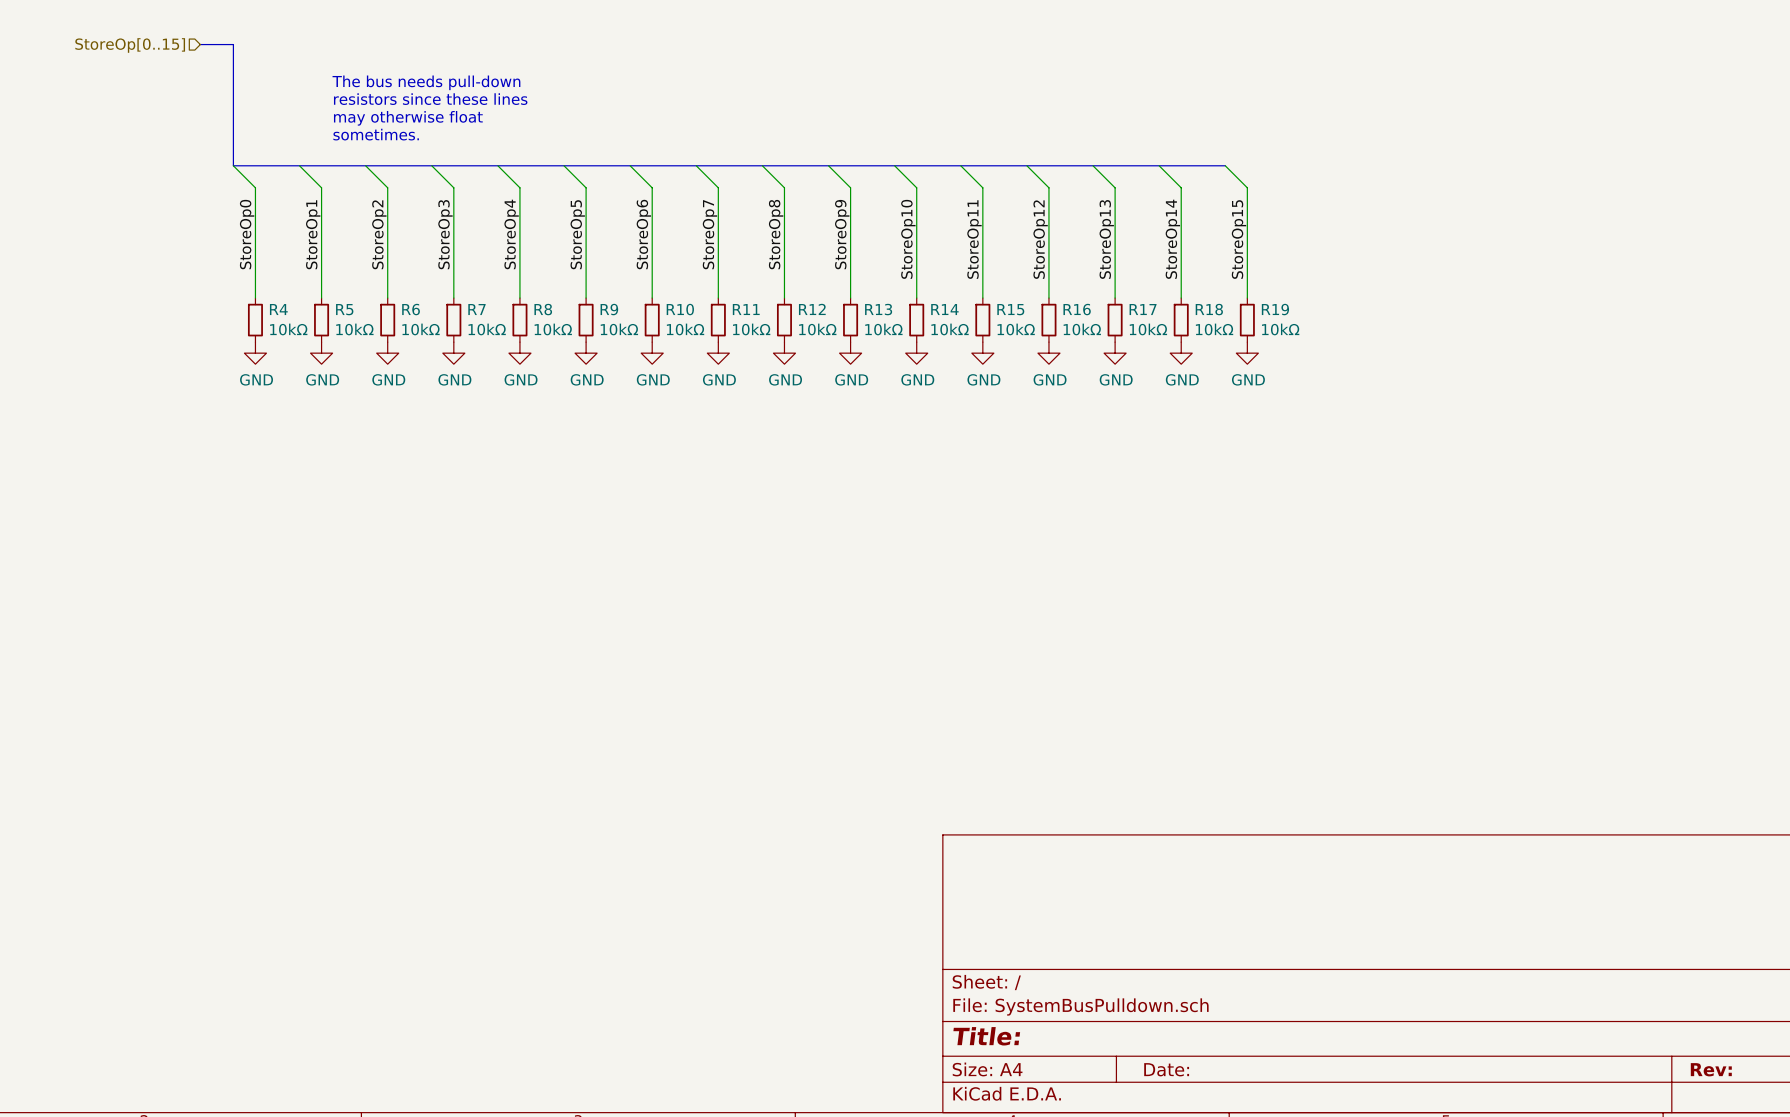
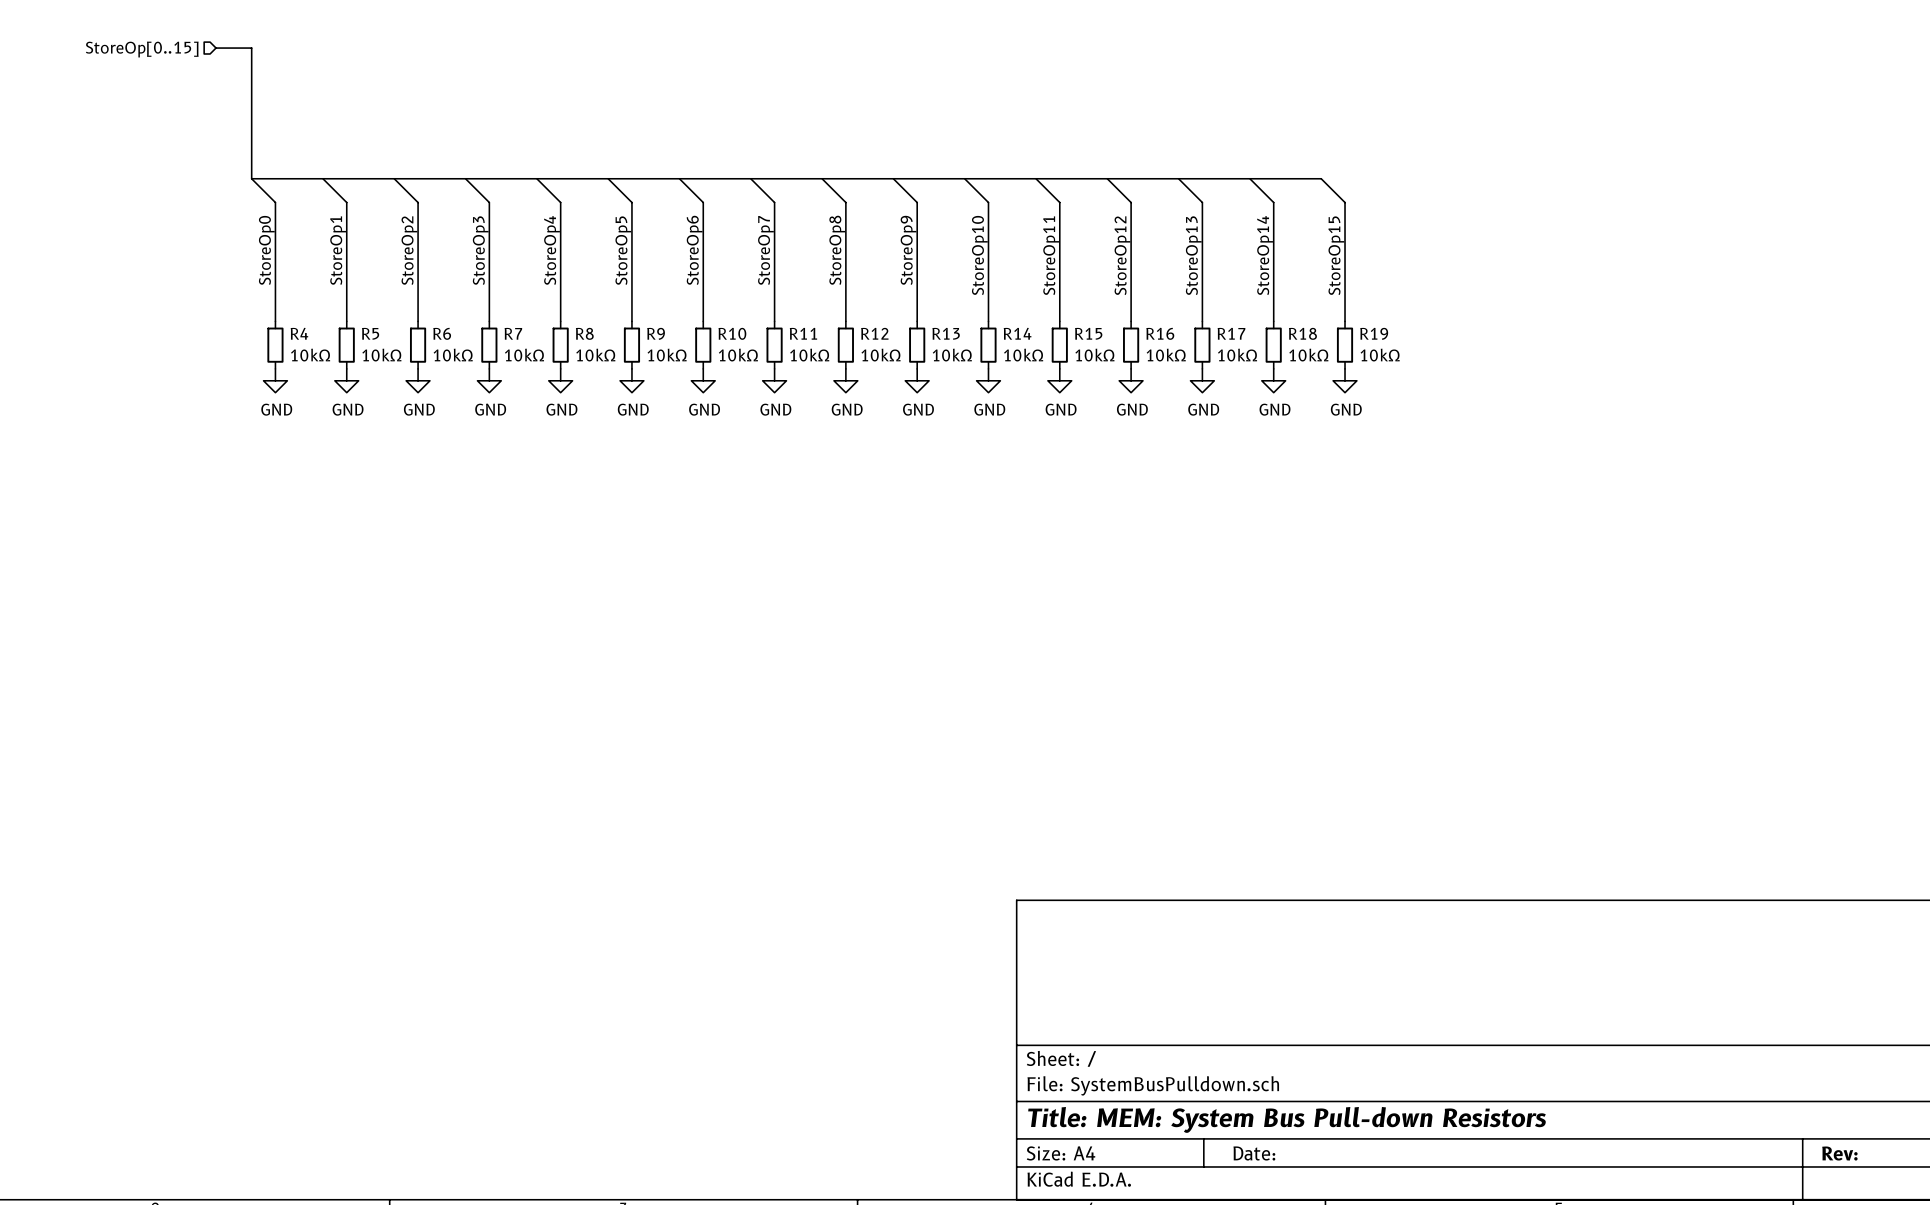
text: The bus needs pull-down (426, 82) -> none
text: resistors since these lines (430, 99) -> none
text: may otherwise float (408, 118) -> none
text: sometimes. (376, 134) -> none
title block: Title: (986, 1036) -> Title: MEM: System Bus Pull-down Resistors (1287, 1119)

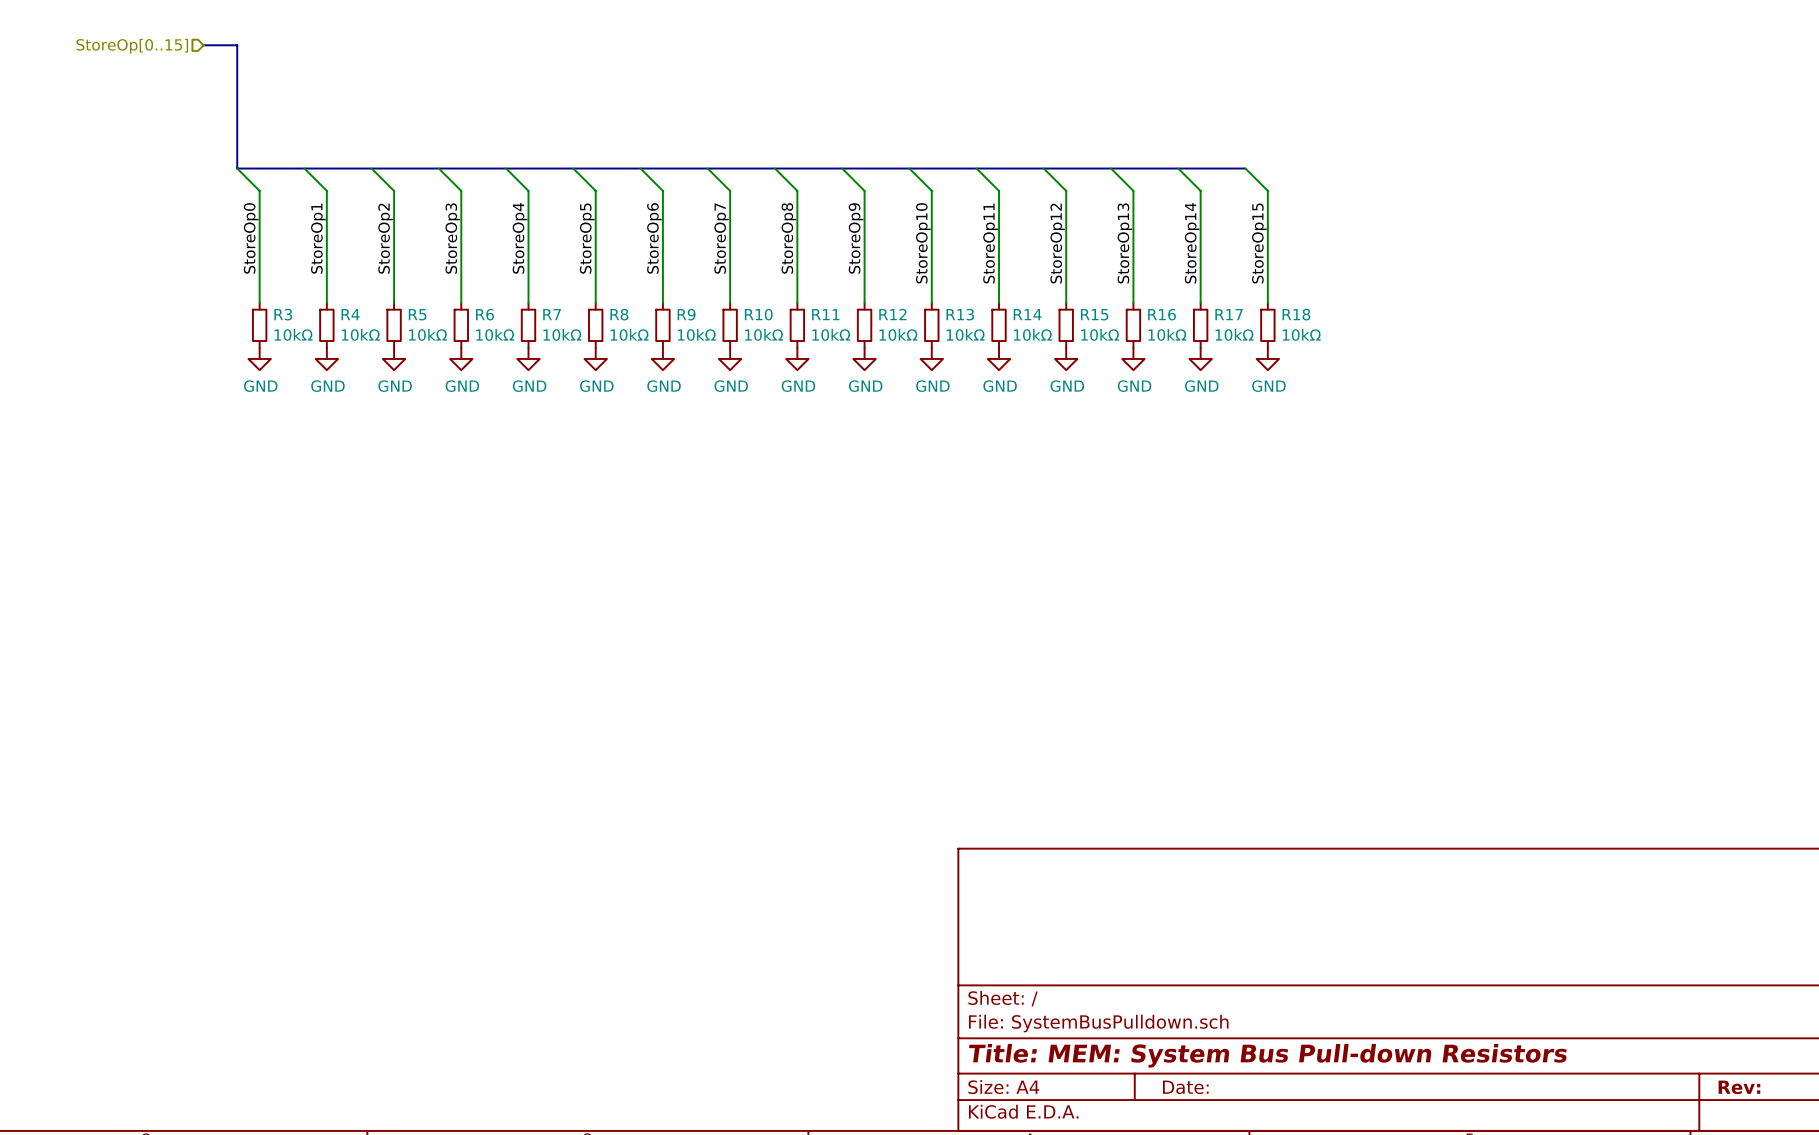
R4 name: R4 (299, 333) -> R3 (283, 314)
R5 name: R5 (370, 333) -> R4 (350, 314)
R6 name: R6 (442, 333) -> R5 (417, 314)
R7 name: R7 (513, 333) -> R6 (485, 314)
R8 name: R8 (584, 333) -> R7 (552, 314)
R9 name: R9 (656, 333) -> R8 (619, 314)
R10 name: R10 (732, 333) -> R9 (686, 314)
R11 name: R11 (803, 333) -> R10 (758, 314)
R12 name: R12 (874, 333) -> R11 (825, 314)
R13 name: R13 (946, 333) -> R12 (892, 314)
R14 name: R14 (1017, 333) -> R13 (960, 314)
R15 name: R15 (1088, 333) -> R14 (1027, 314)
R16 name: R16 (1160, 333) -> R15 (1094, 314)
R17 name: R17 (1231, 333) -> R16 (1162, 314)
R18 name: R18 (1302, 333) -> R17 (1229, 314)
R19 name: R19 (1374, 333) -> R18 (1296, 314)

